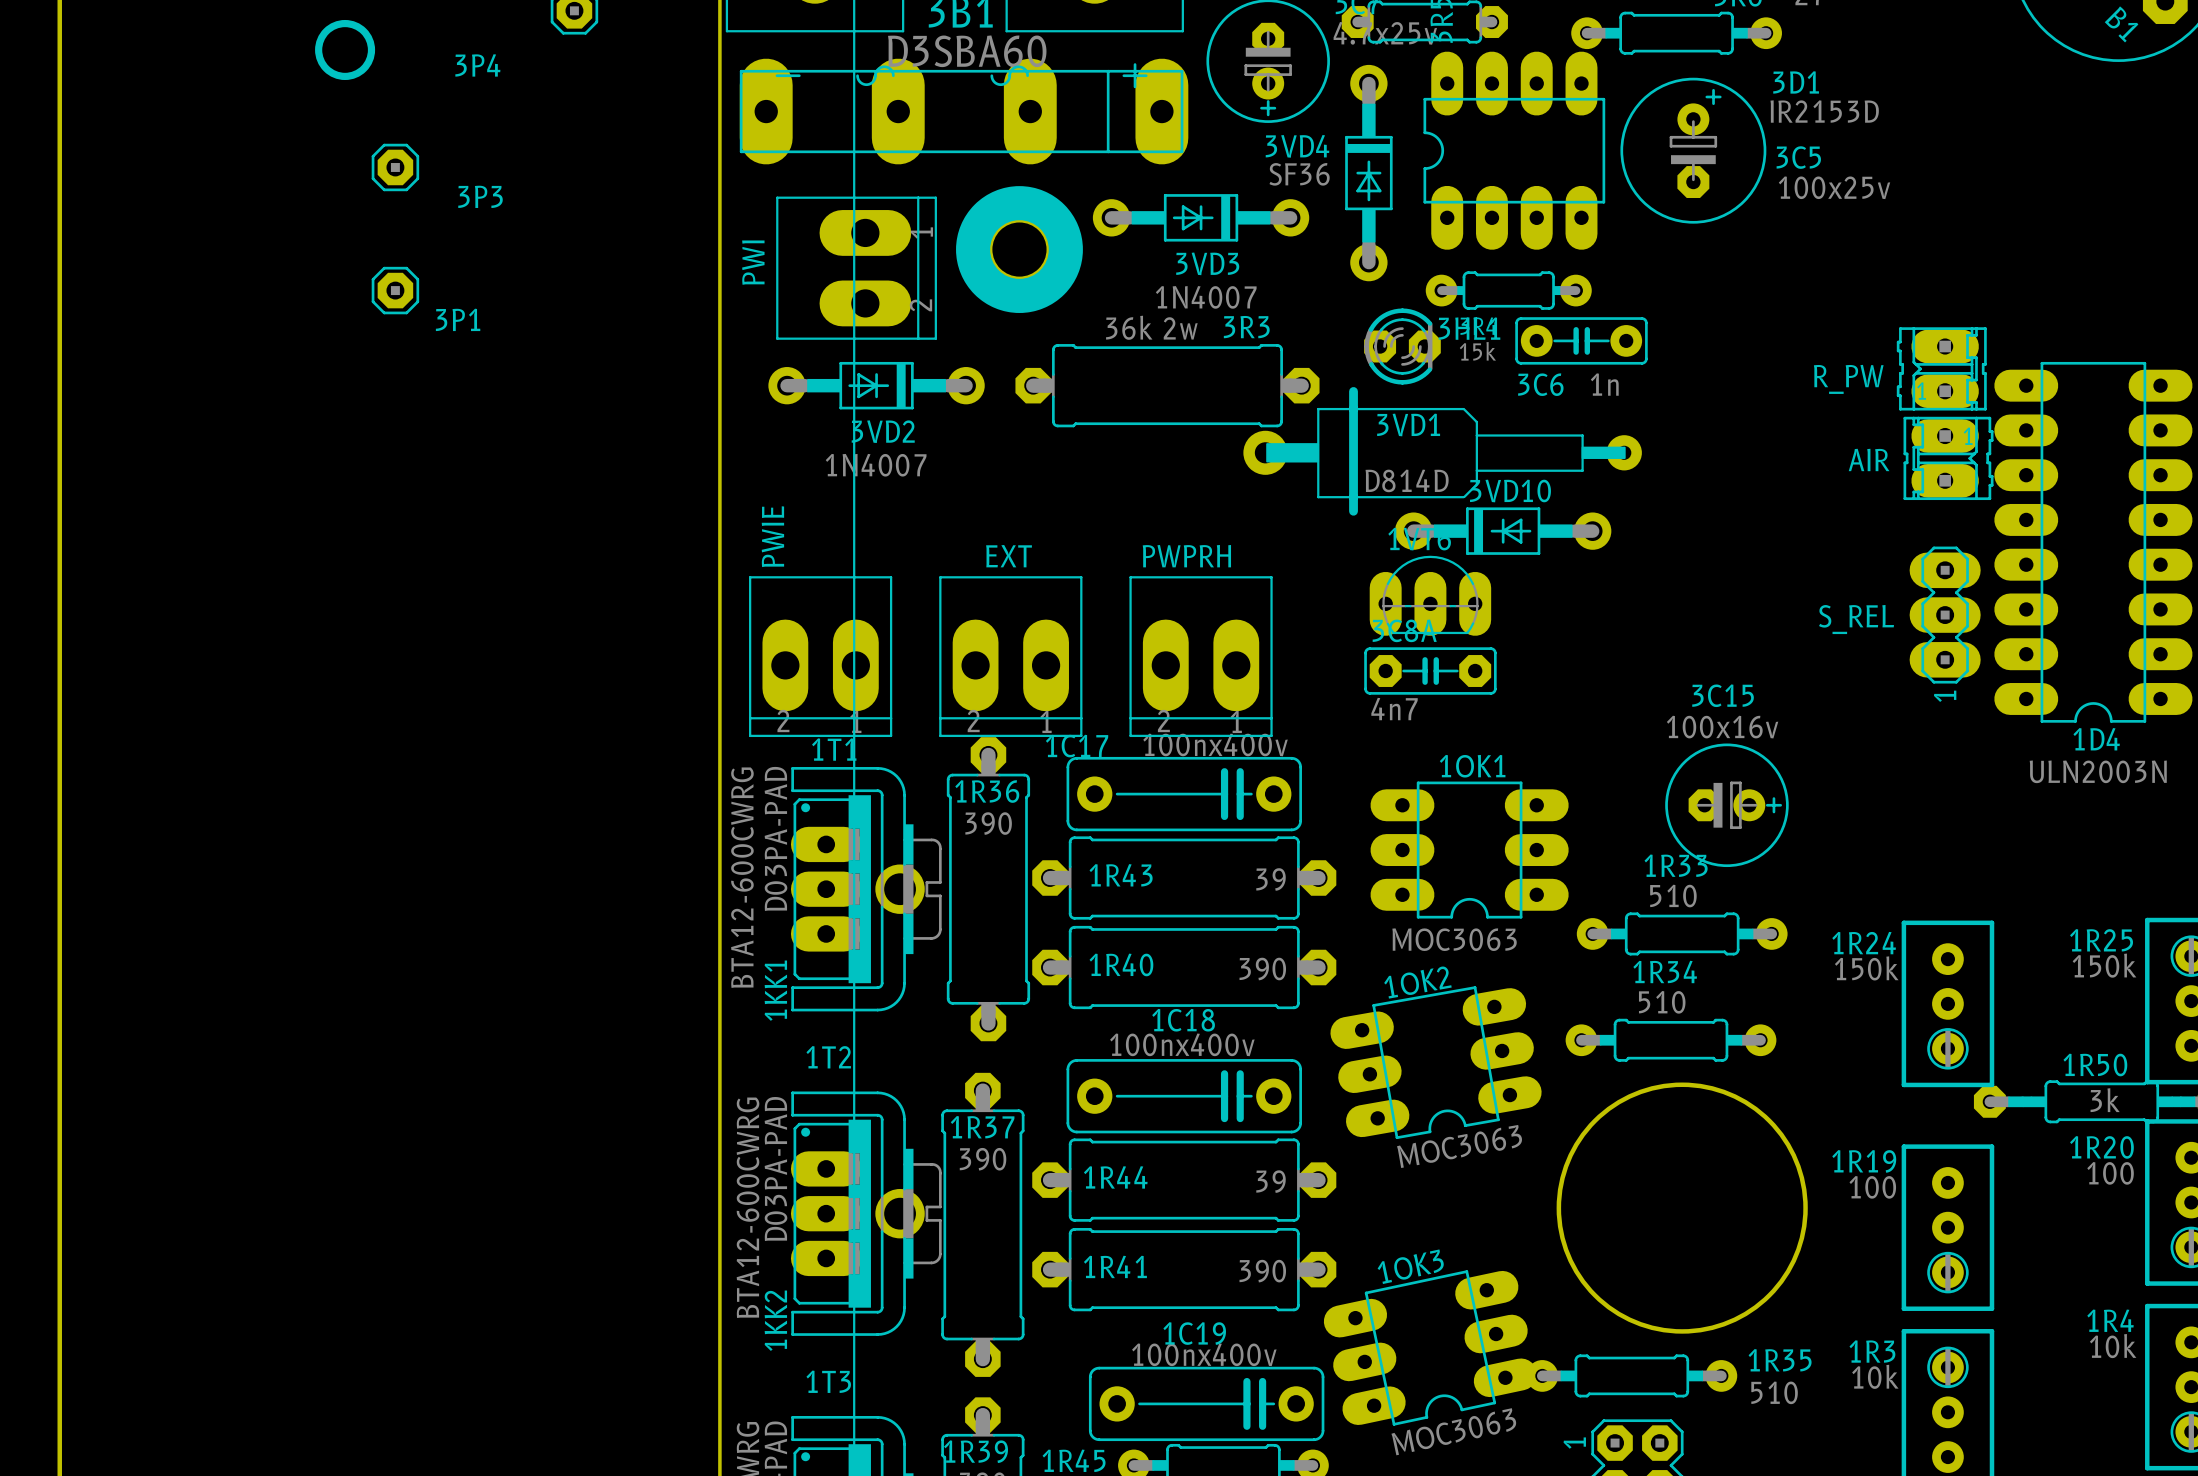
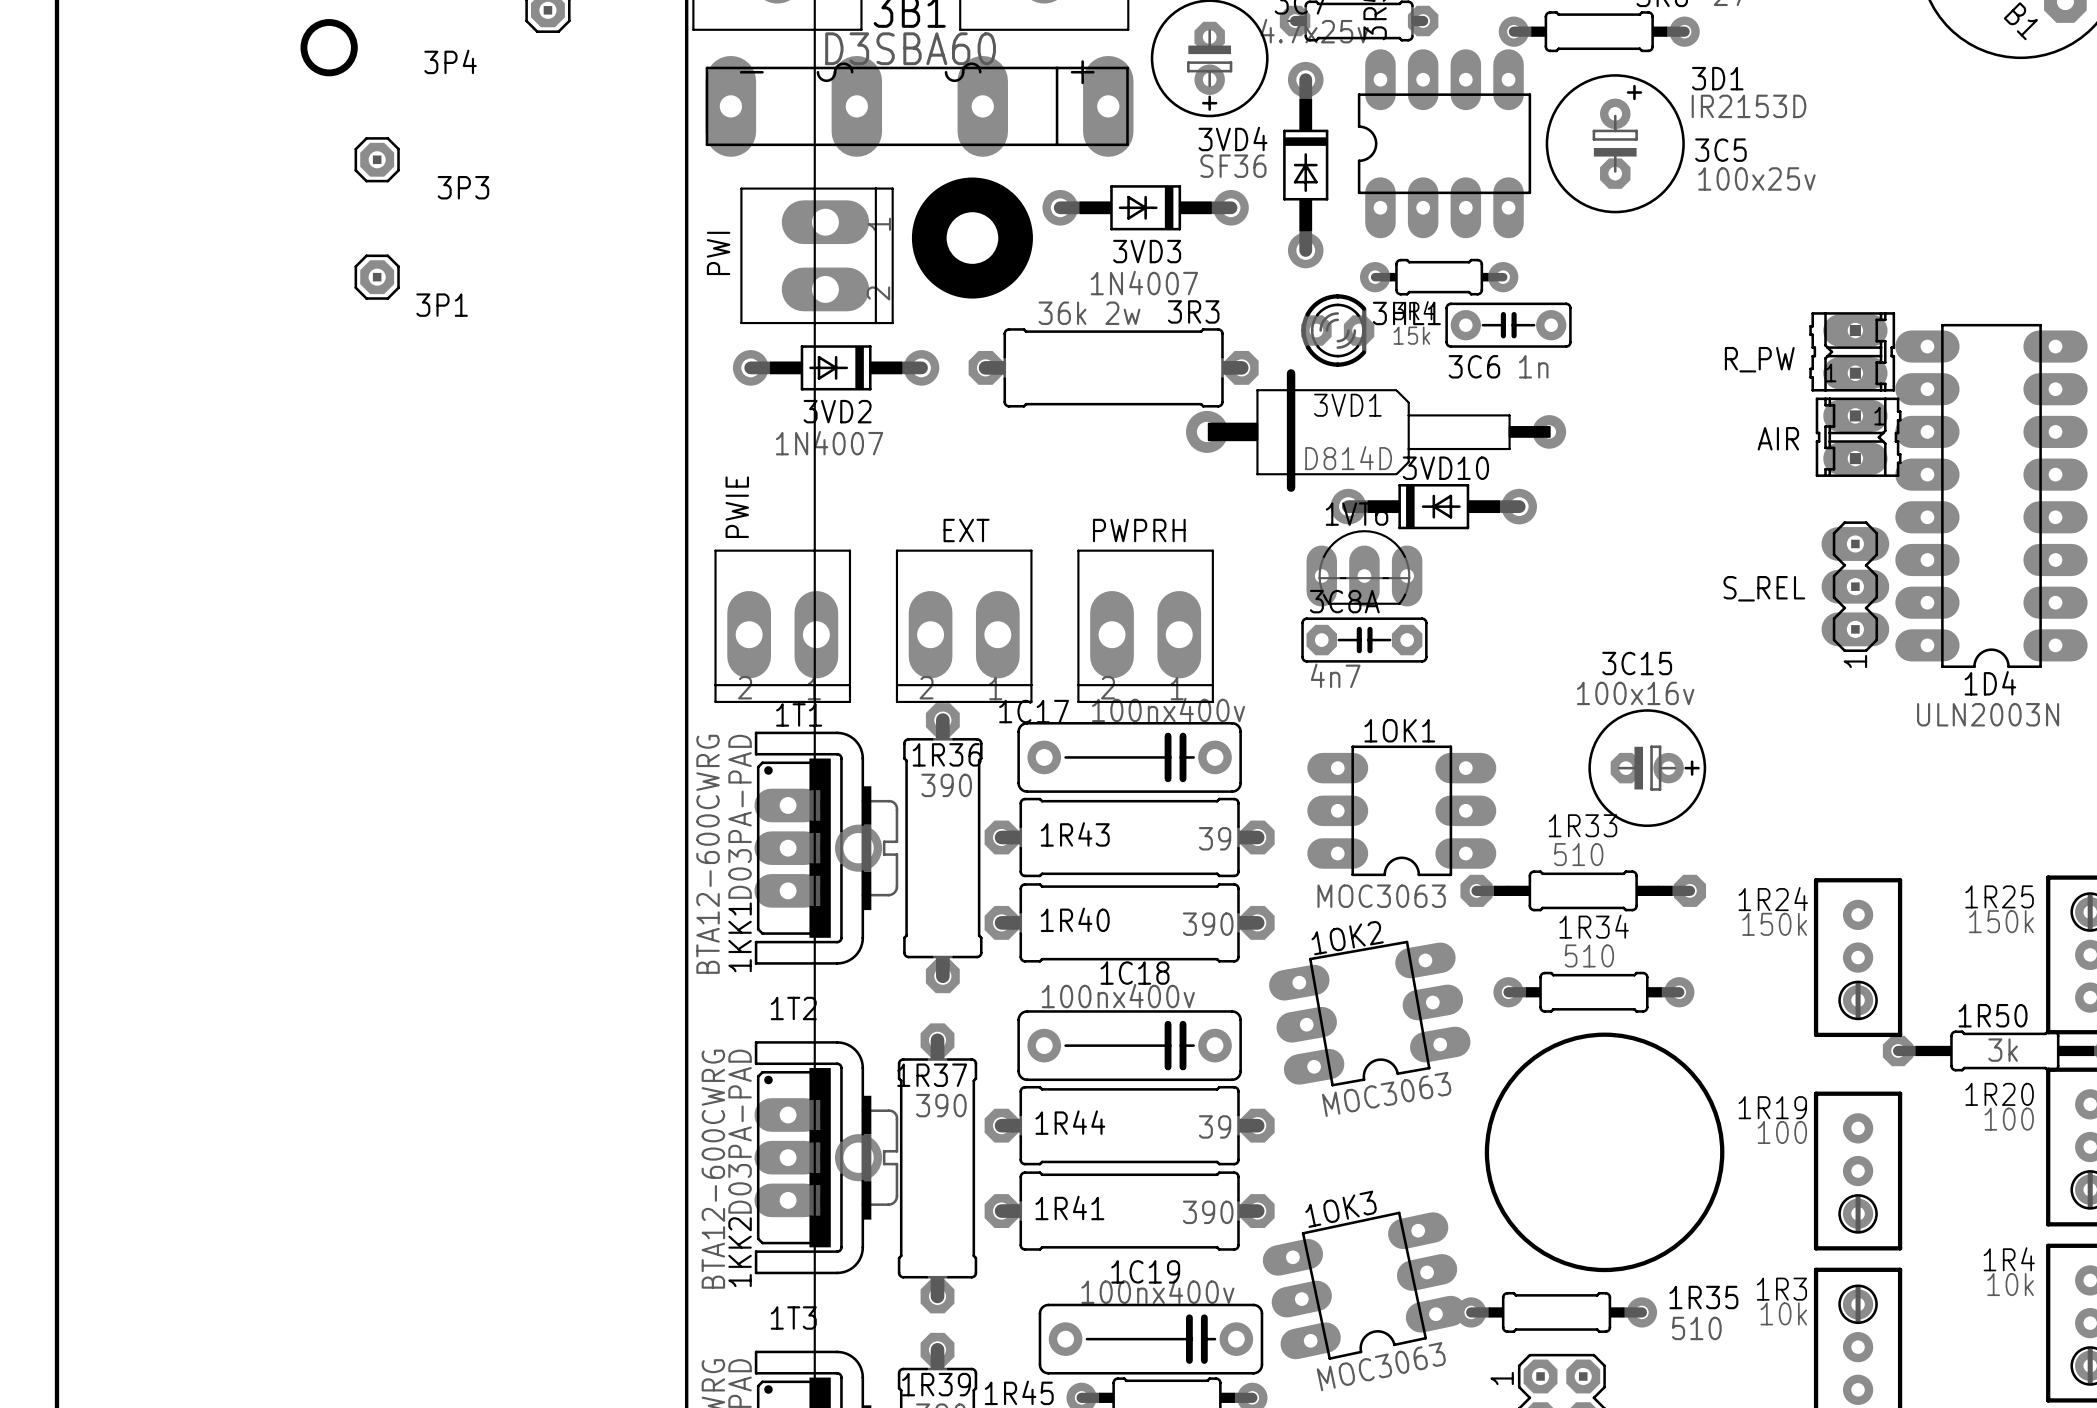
1D4 footprint: [1994, 361, 2193, 723] -> [1895, 323, 2088, 669]
1R33 footprint: [1576, 912, 1788, 956] -> [1460, 870, 1707, 912]

